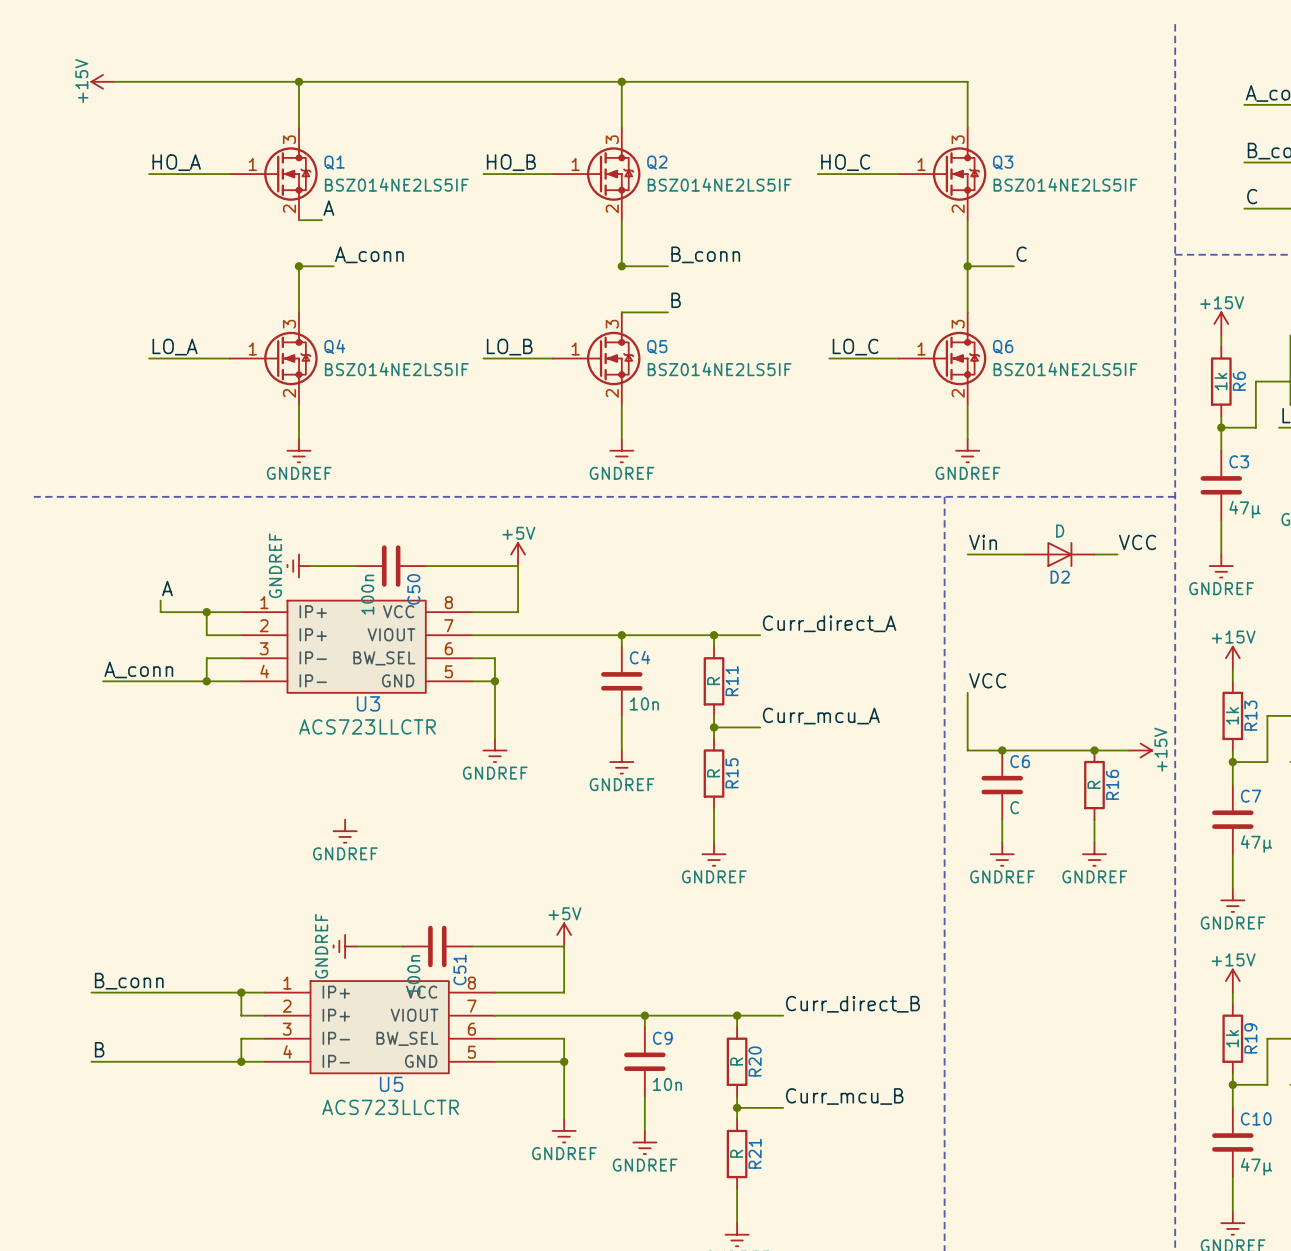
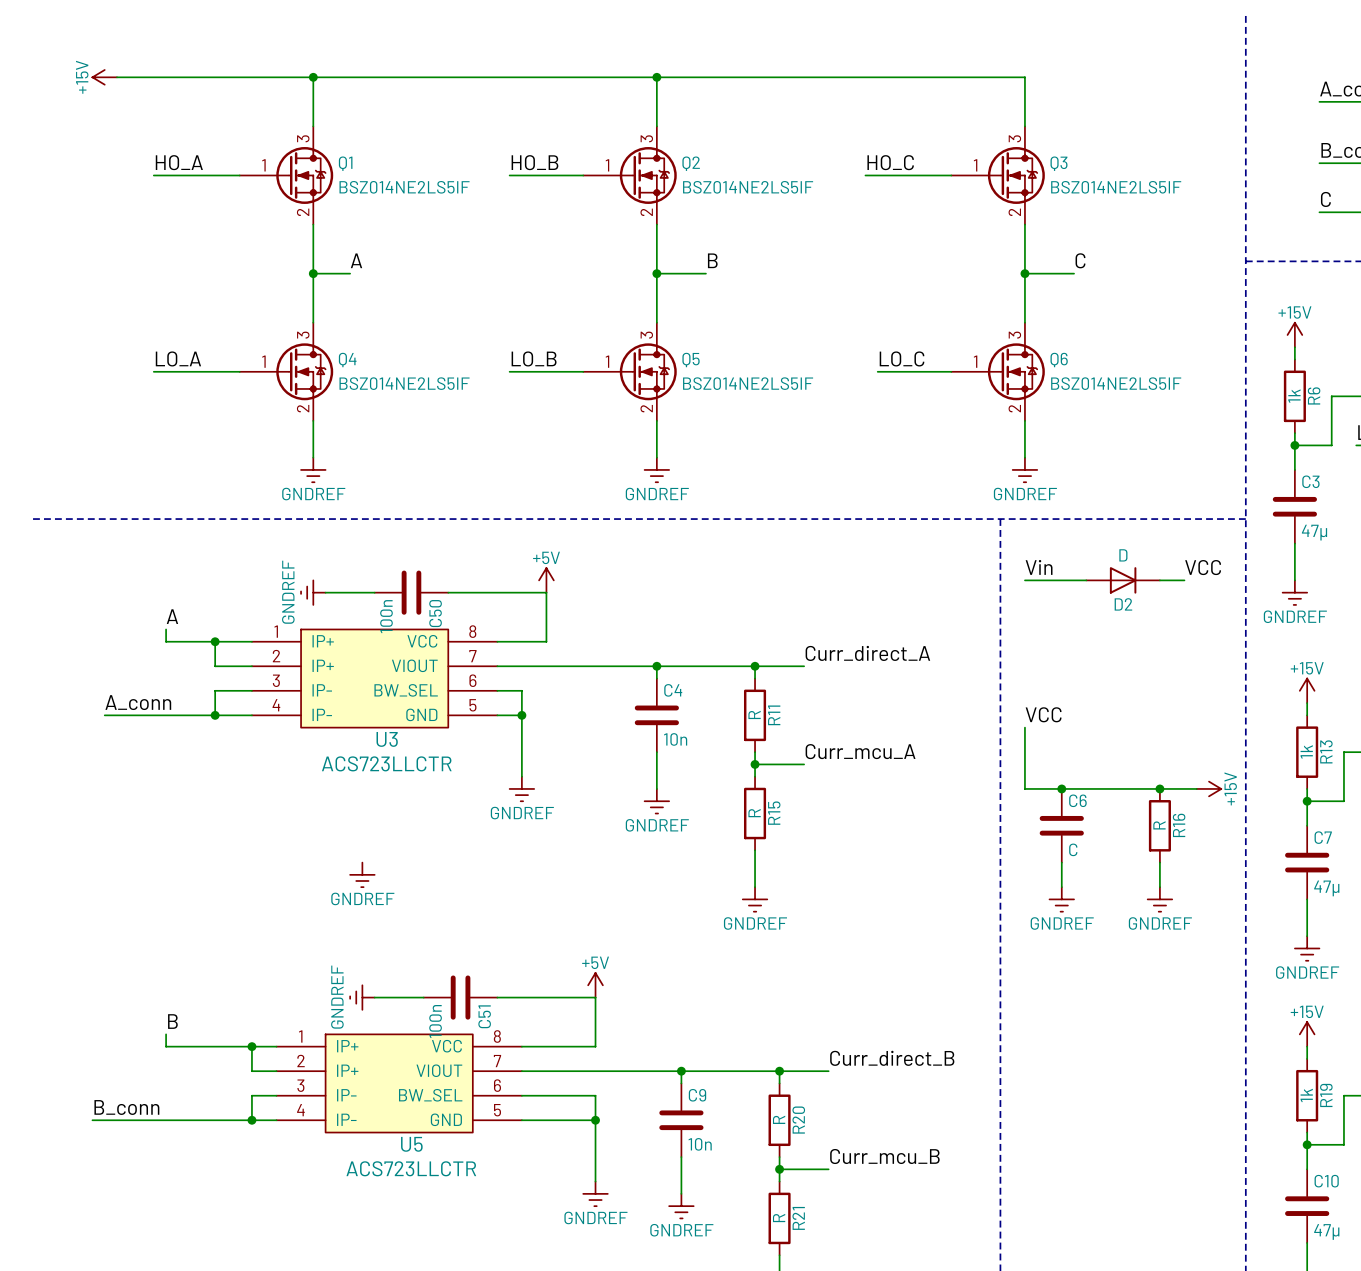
label: A (328, 208) -> none
wire: (298, 220) (322, 220) -> (313, 224) (313, 273)
label: A_conn (369, 254) -> A (356, 260)
label: B_conn (705, 254) -> B (712, 260)
label: B (676, 300) -> none
wire: (621, 312) (667, 312) -> (656, 322) (656, 273)
label: none -> B (172, 1021)
label: B_conn (129, 981) -> none
wire: (91, 992) (160, 992) -> (166, 1034) (166, 1046)
label: B (99, 1049) -> B_conn (126, 1107)

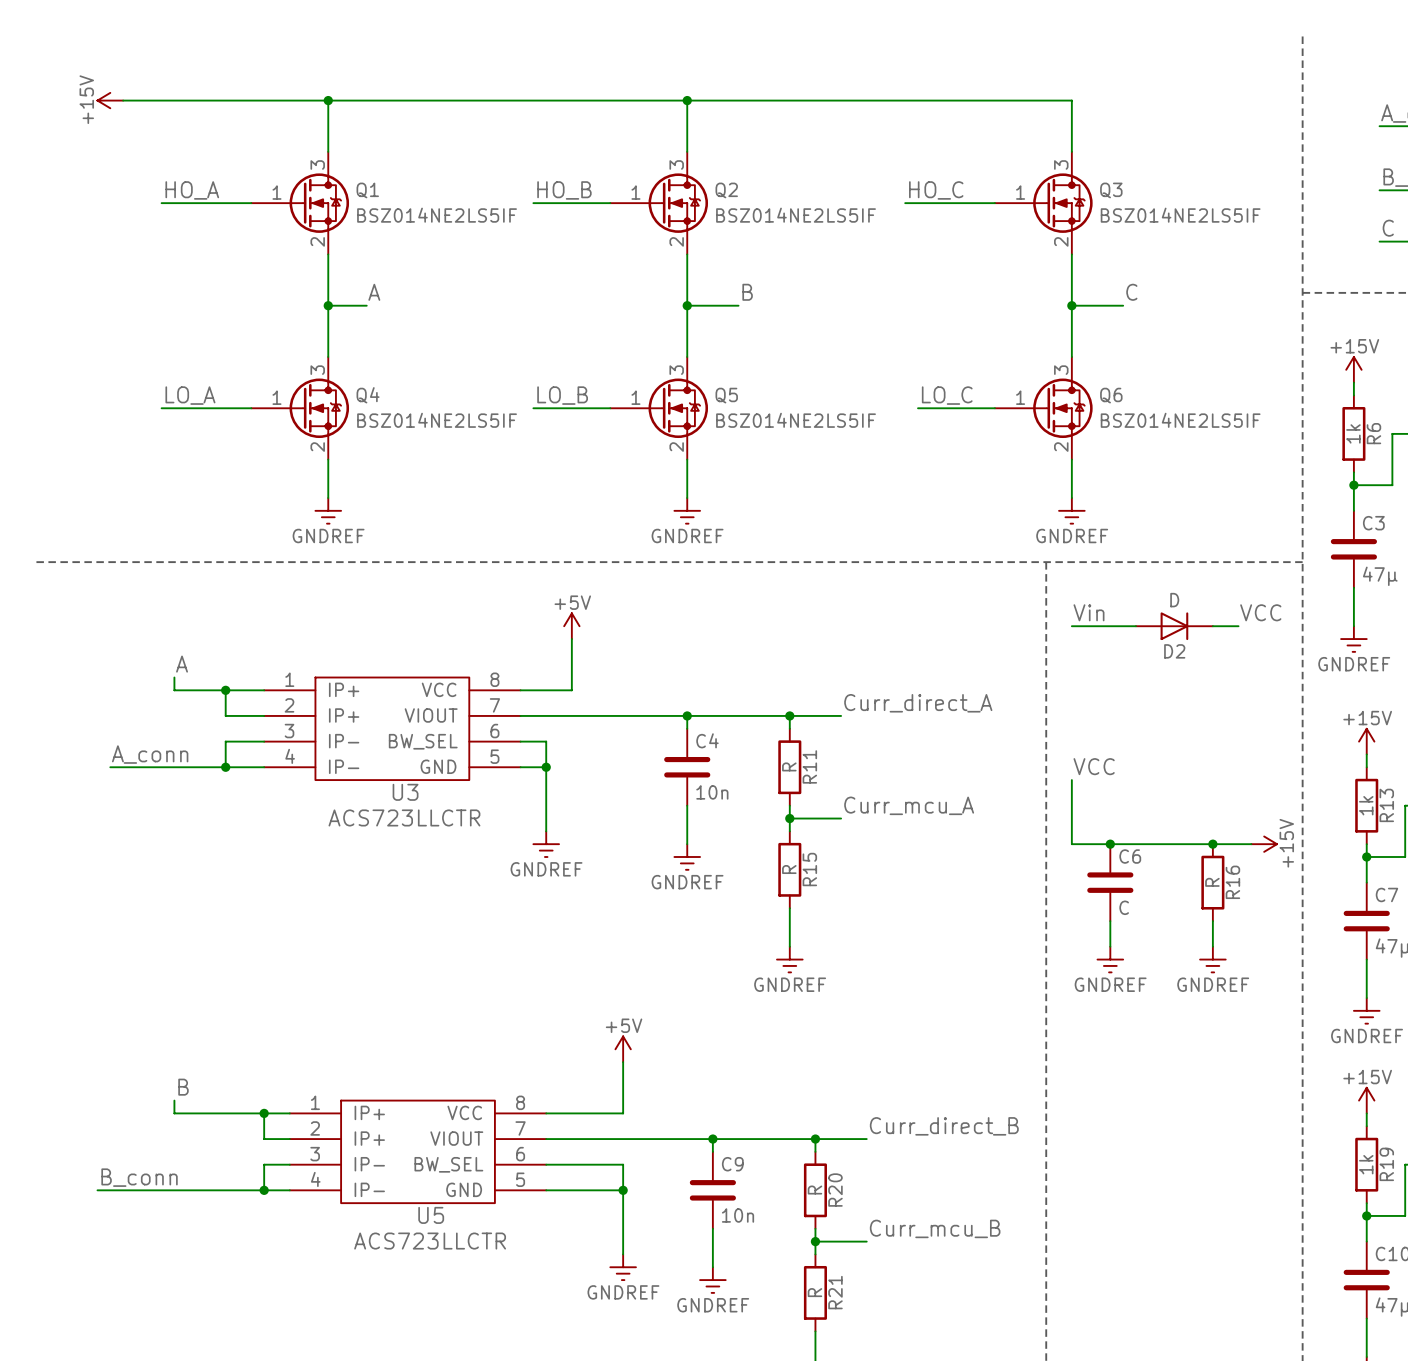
power symbol: GNDREF (313, 592) -> none
wire: (325, 592) (374, 592) -> none
C50: 100n (411, 592) -> none
wire: (448, 592) (546, 592) -> none
power symbol: GNDREF (362, 874) -> none
power symbol: GNDREF (362, 997) -> none
wire: (374, 997) (423, 997) -> none
C51: 100n (460, 997) -> none
wire: (497, 997) (595, 997) -> none

